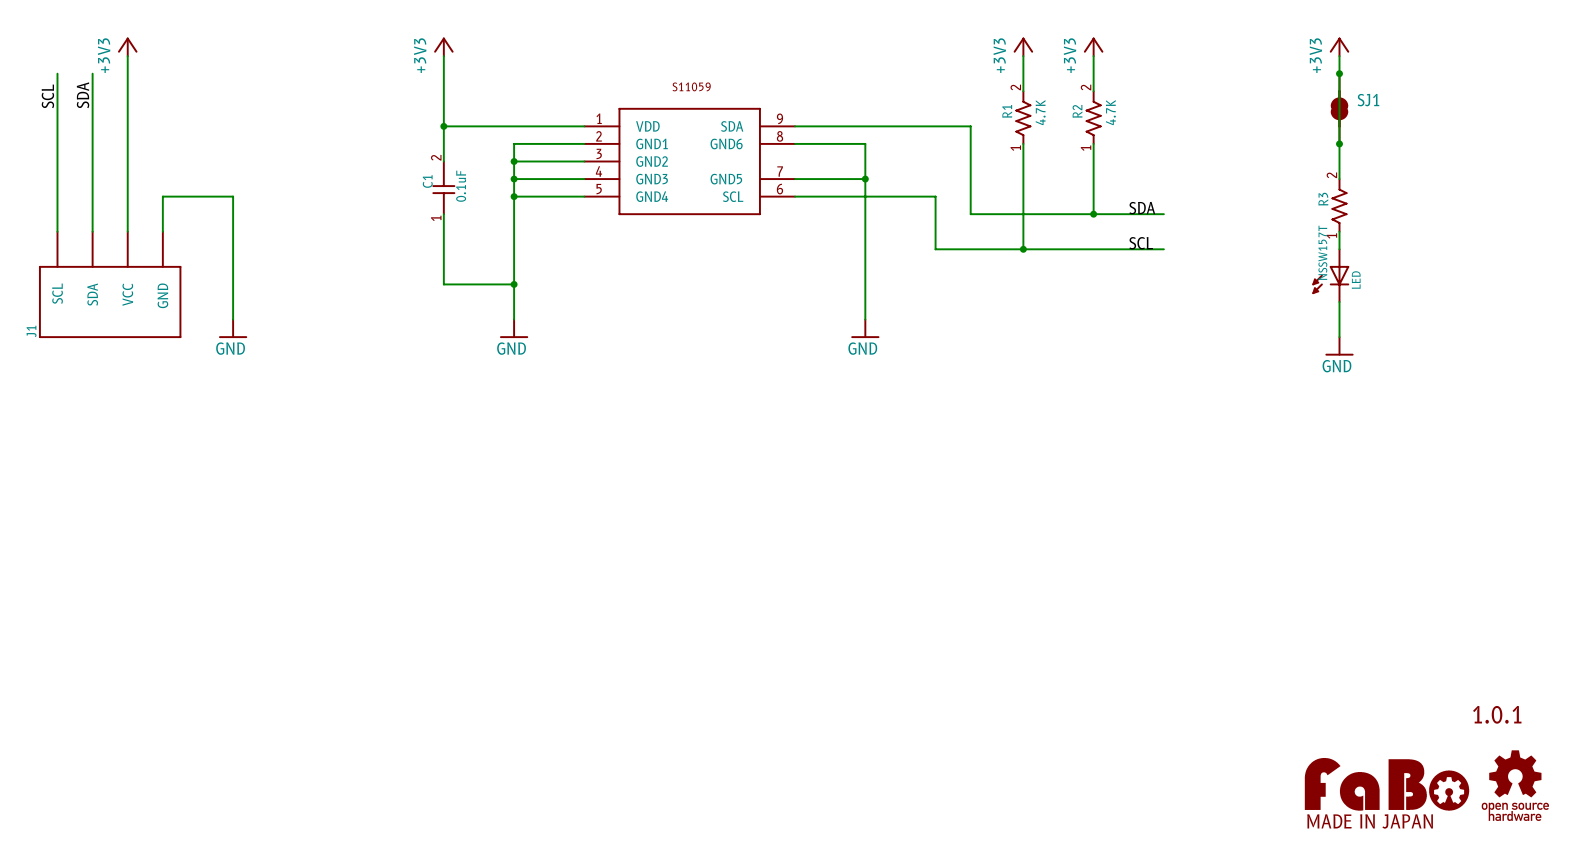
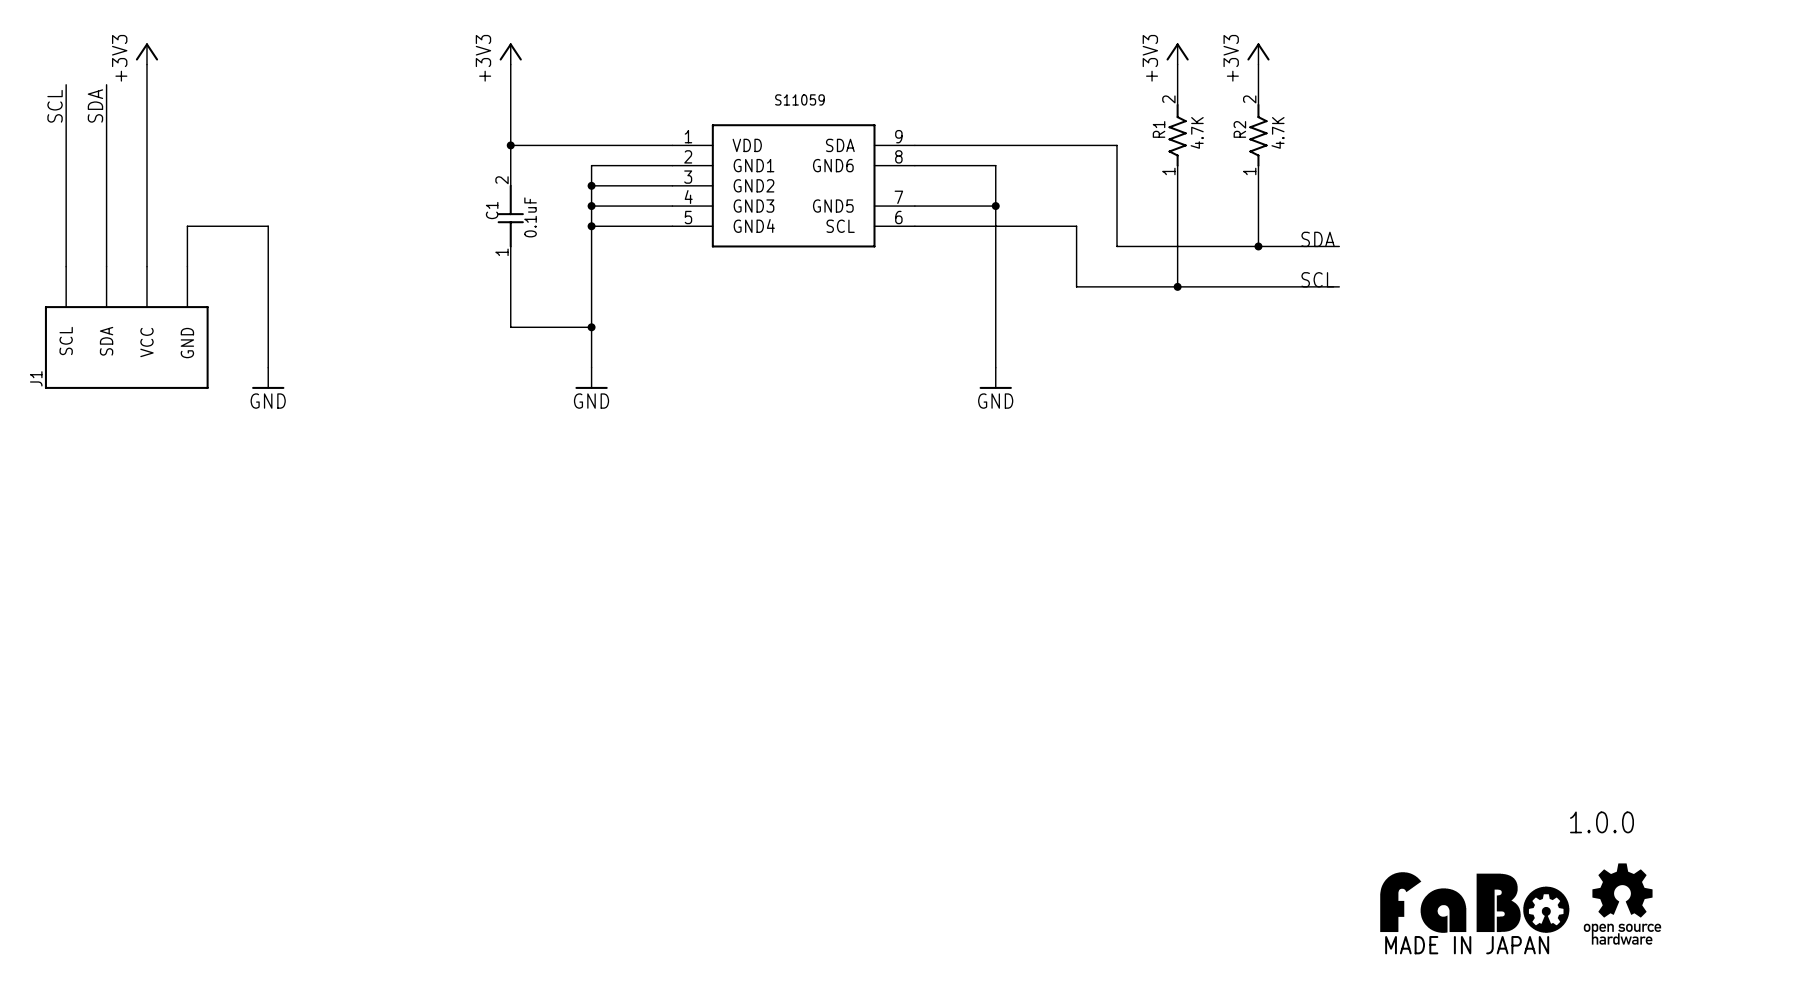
power symbol: +3V3 (1339, 46) -> none
wire: (1339, 56) (1339, 179) -> none
junction: (1339, 73) -> none
SJ1: (1339, 108) -> none
junction: (1339, 143) -> none
R3: (1339, 205) -> none
wire: (1339, 231) (1339, 249) -> none
LED: NSSW157T (1330, 275) -> none
wire: (1339, 301) (1339, 337) -> none
power symbol: GND (1339, 346) -> none
text: none -> 1.0.0 (1602, 822)
text: 1.0.1 (1497, 714) -> none
part position: (1387, 784) -> (1474, 902)
part position: (1515, 785) -> (1622, 904)

